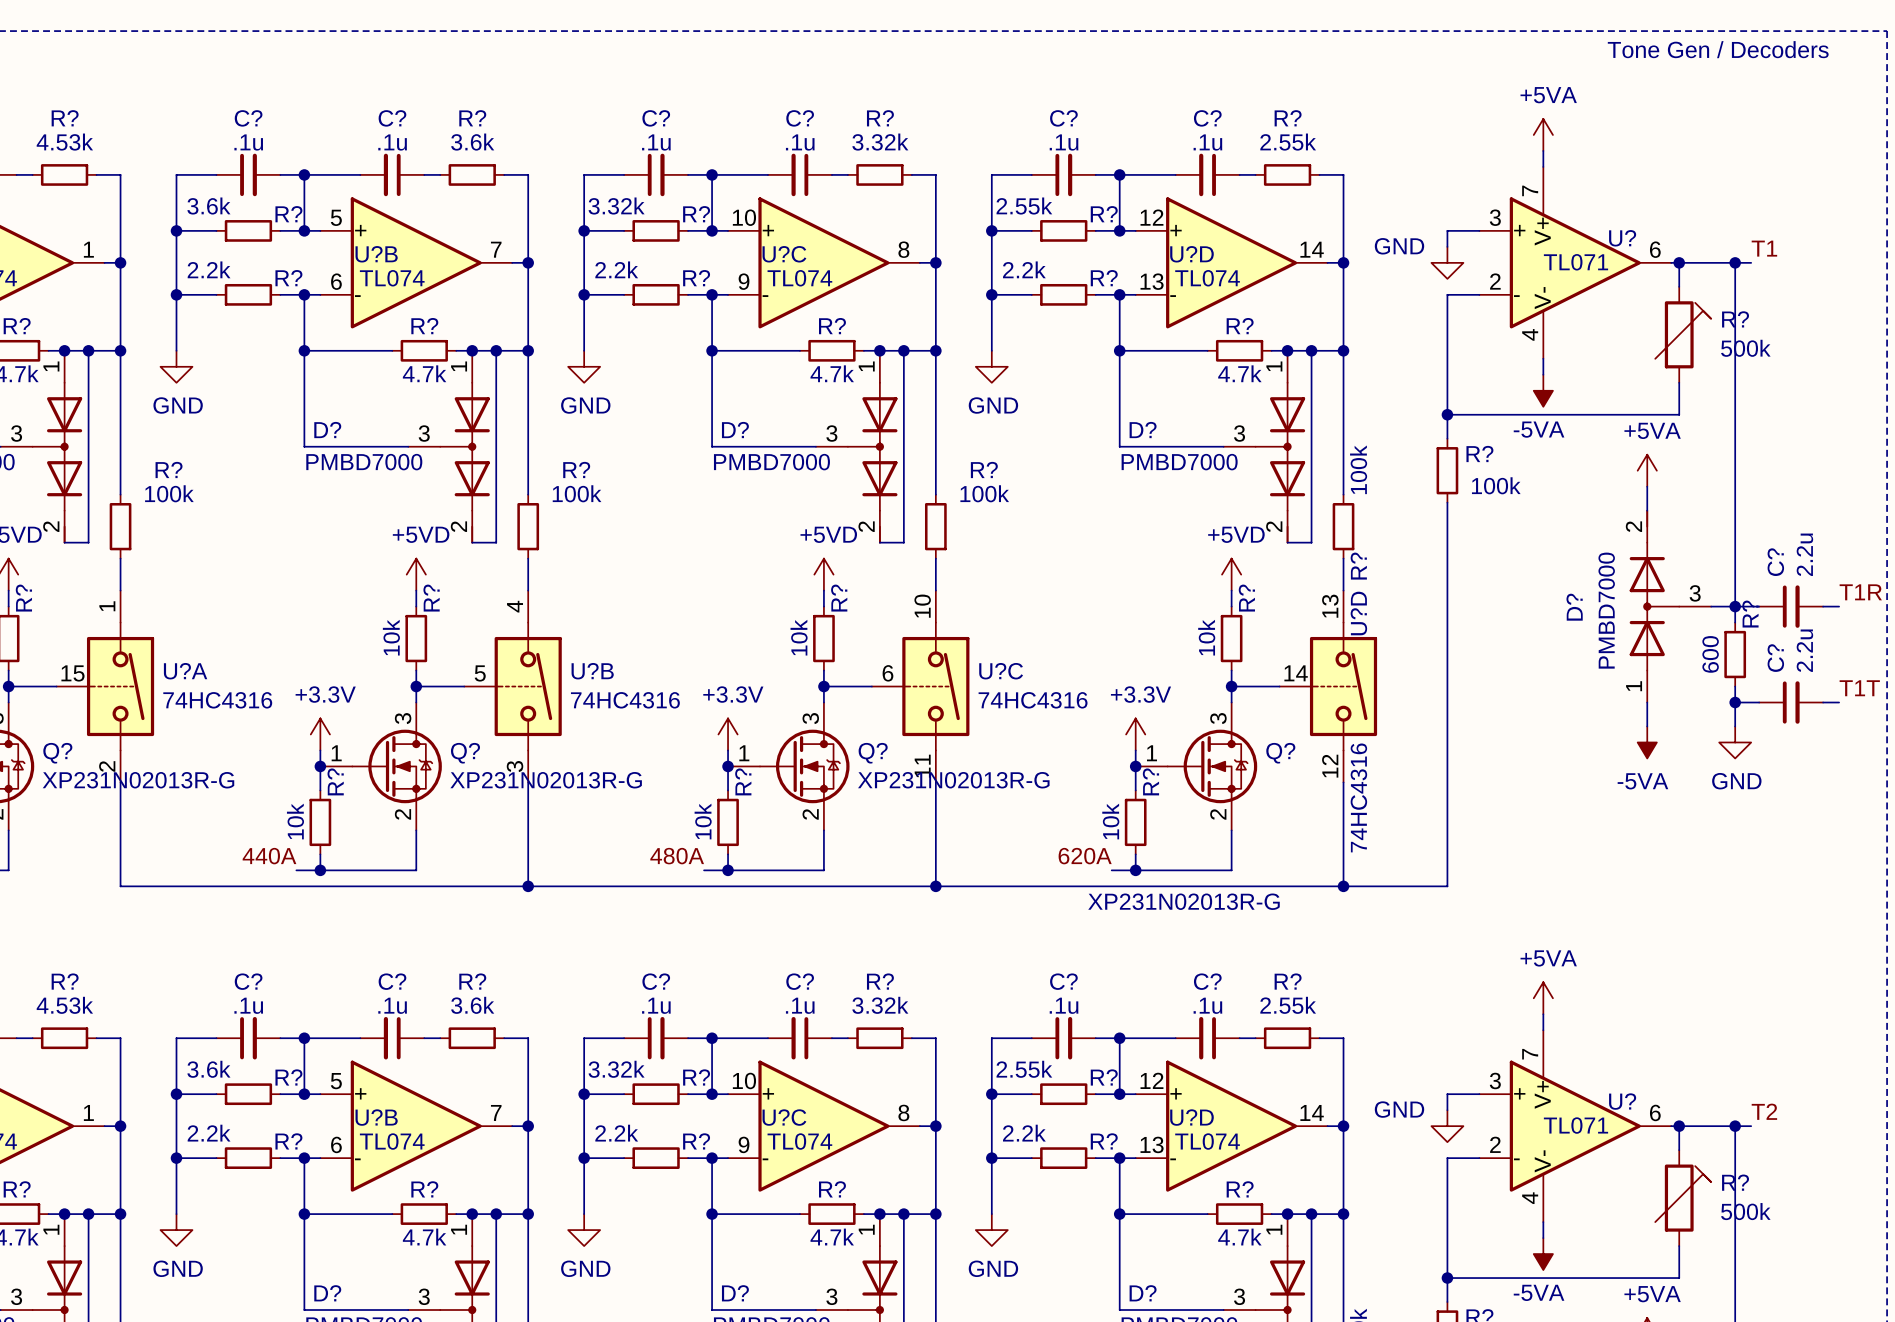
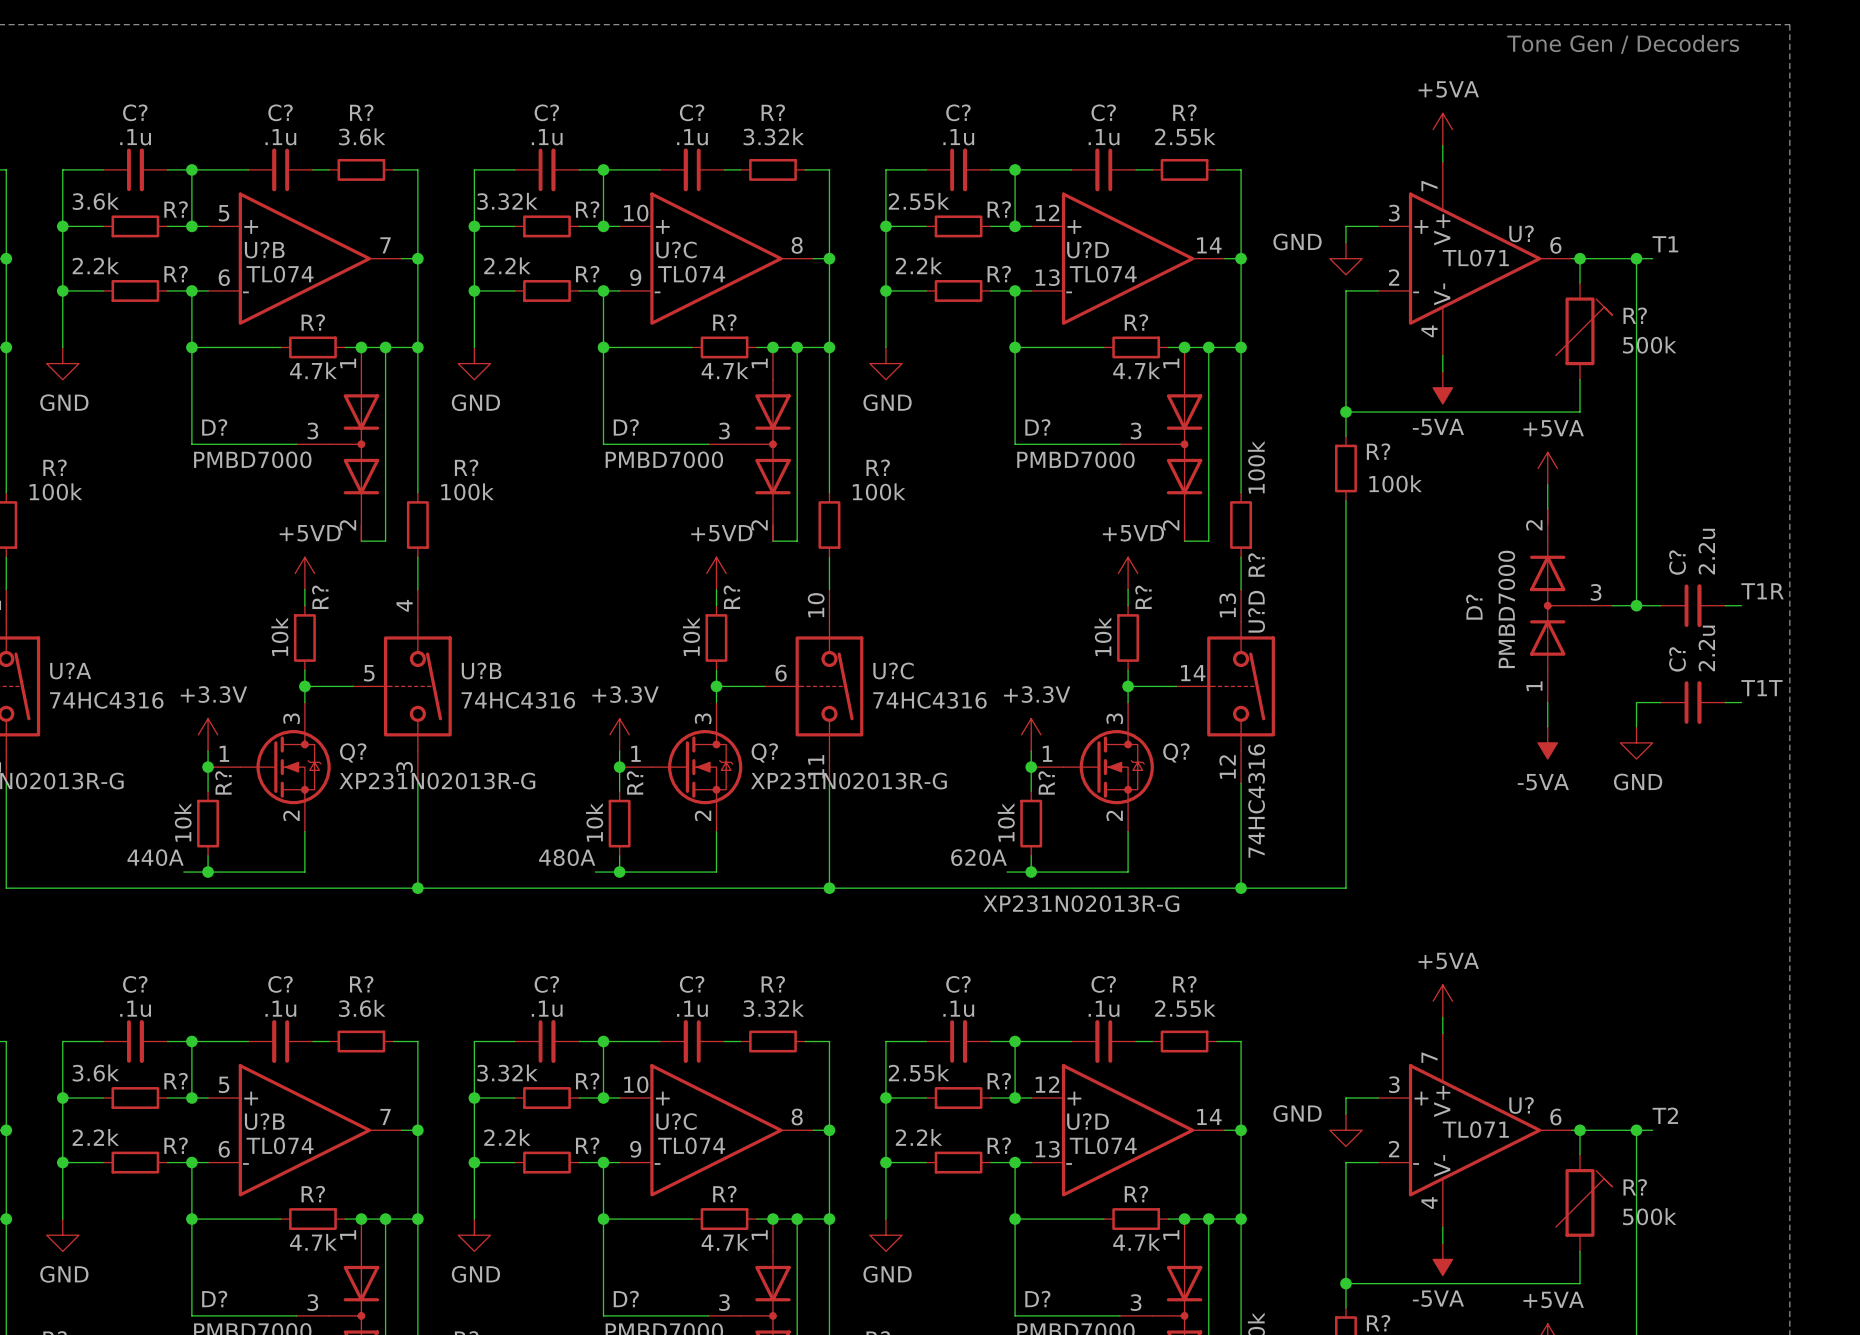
wire: (1735, 606) (1735, 622) -> none
R?: 600 (1735, 654) -> none
wire: (1735, 686) (1735, 702) -> none
junction: (1735, 702) -> none

